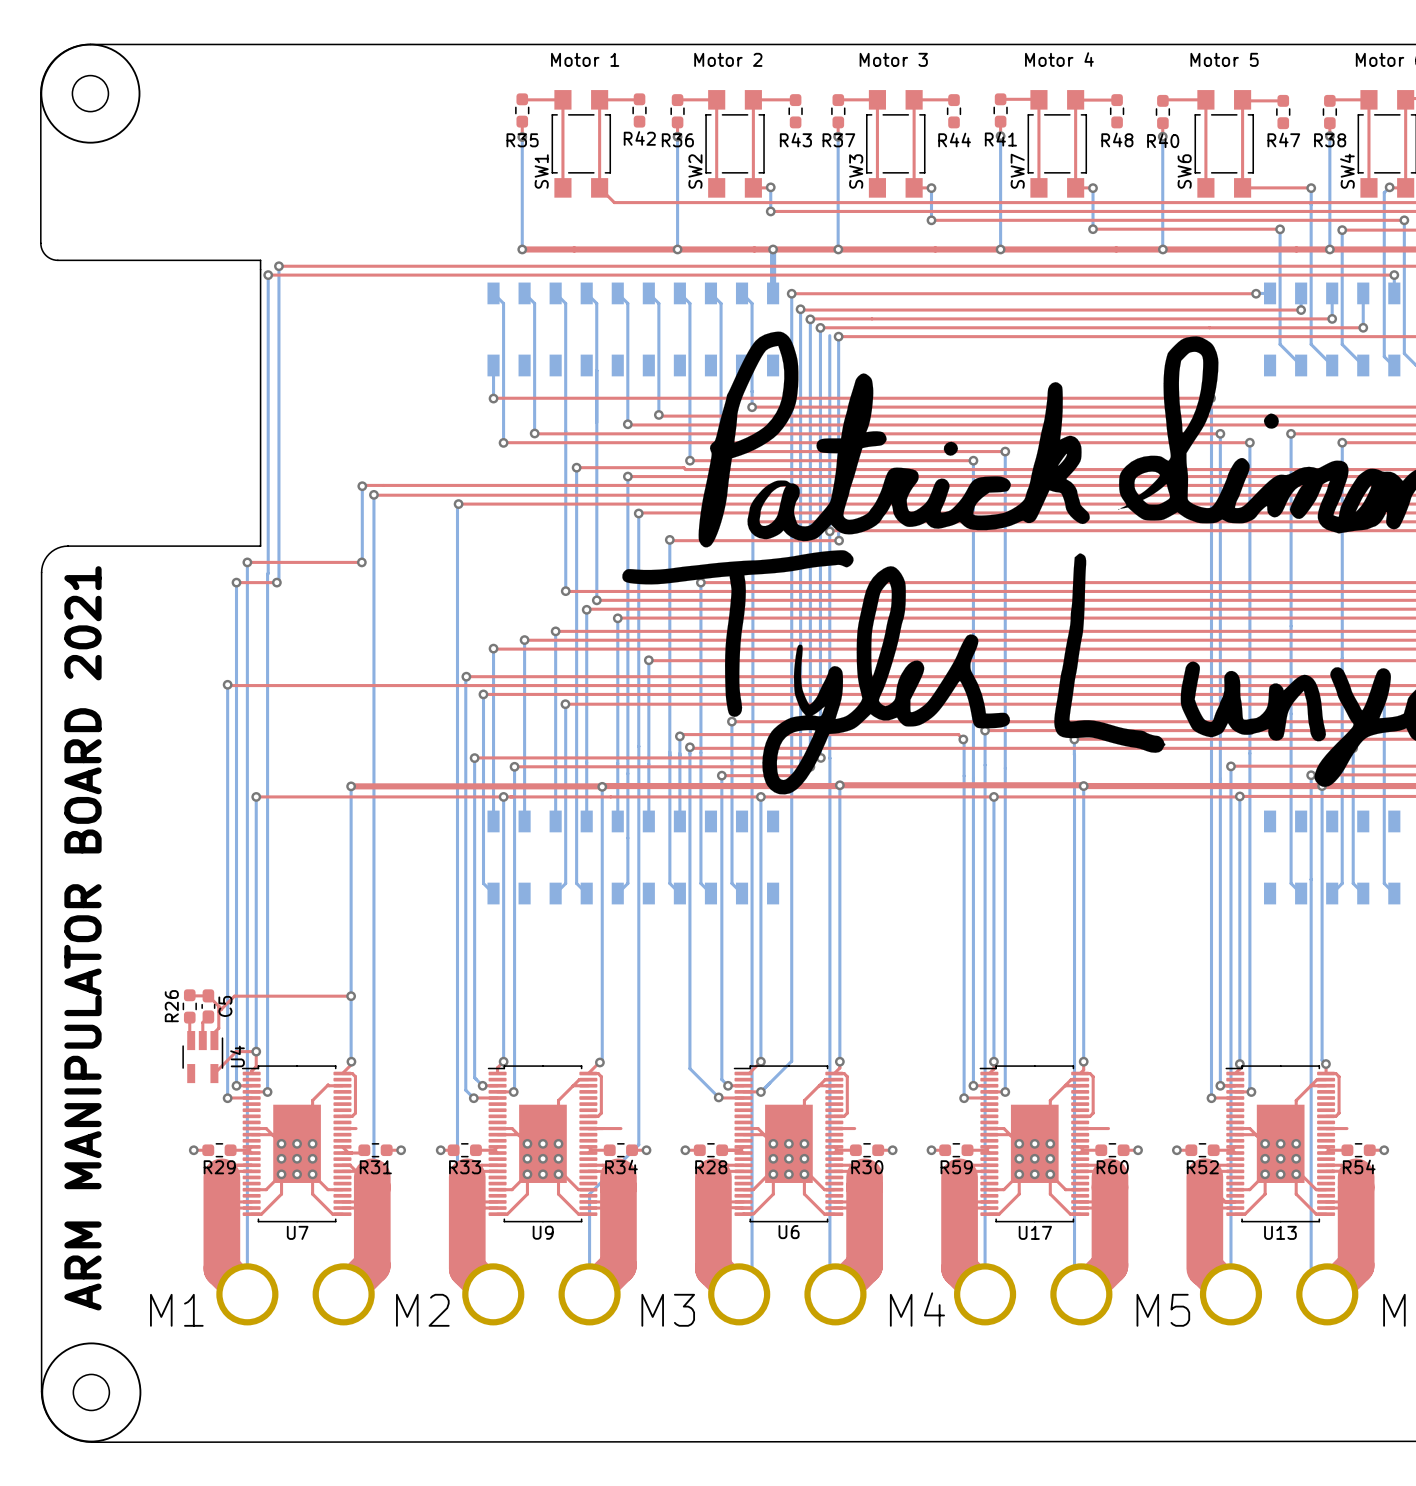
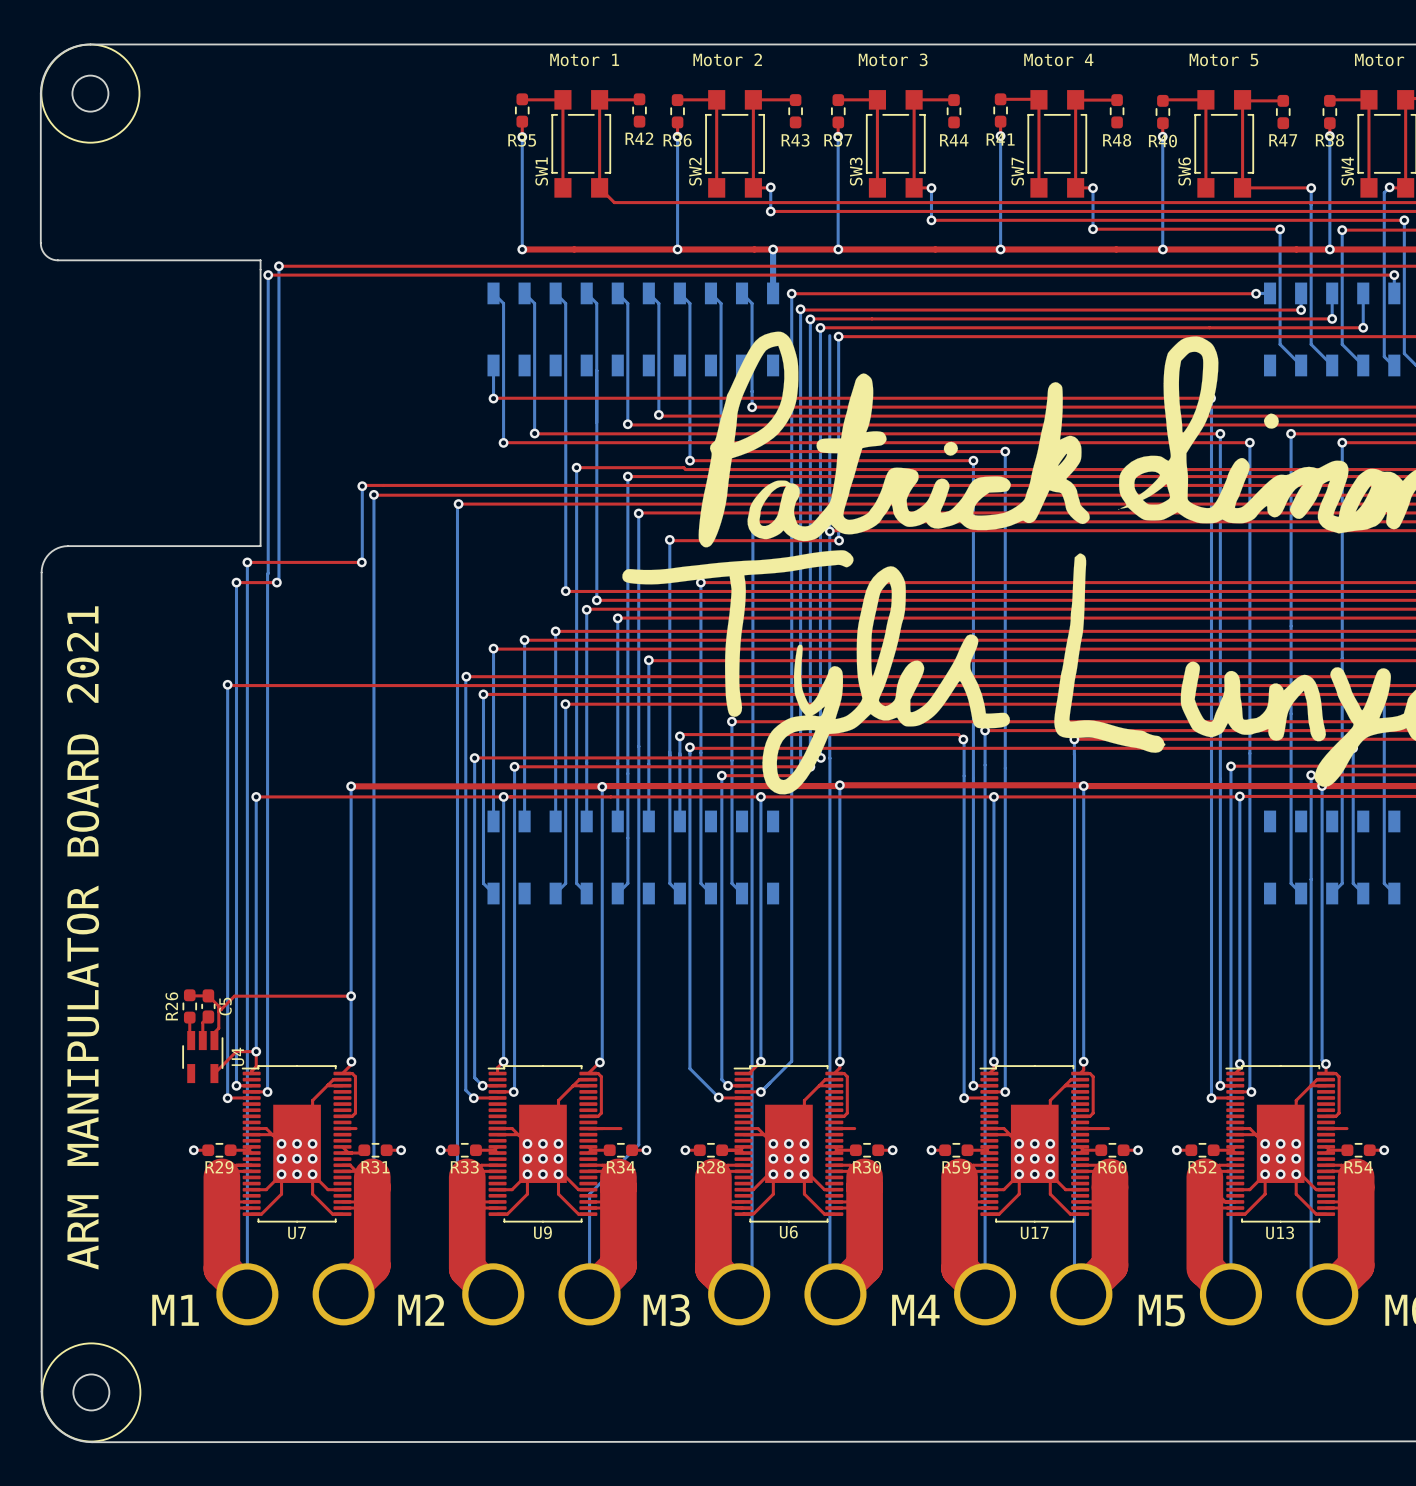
top track: none -> (342, 1079) (333, 1079) (328, 1084)

